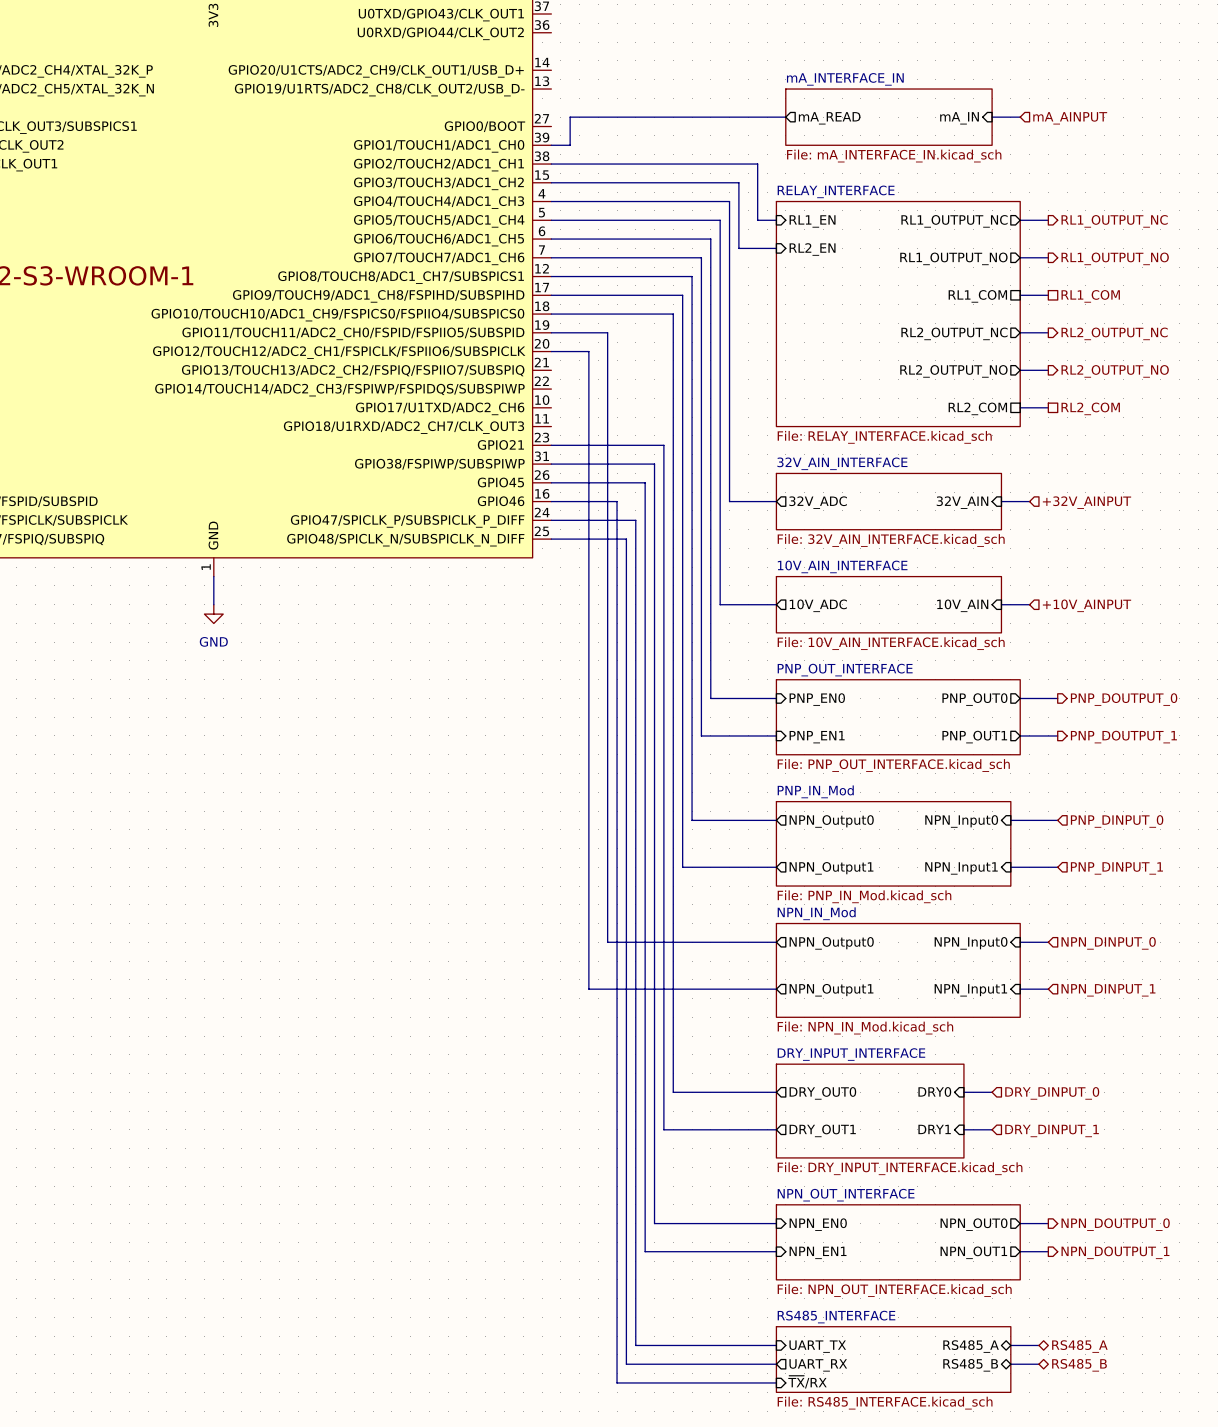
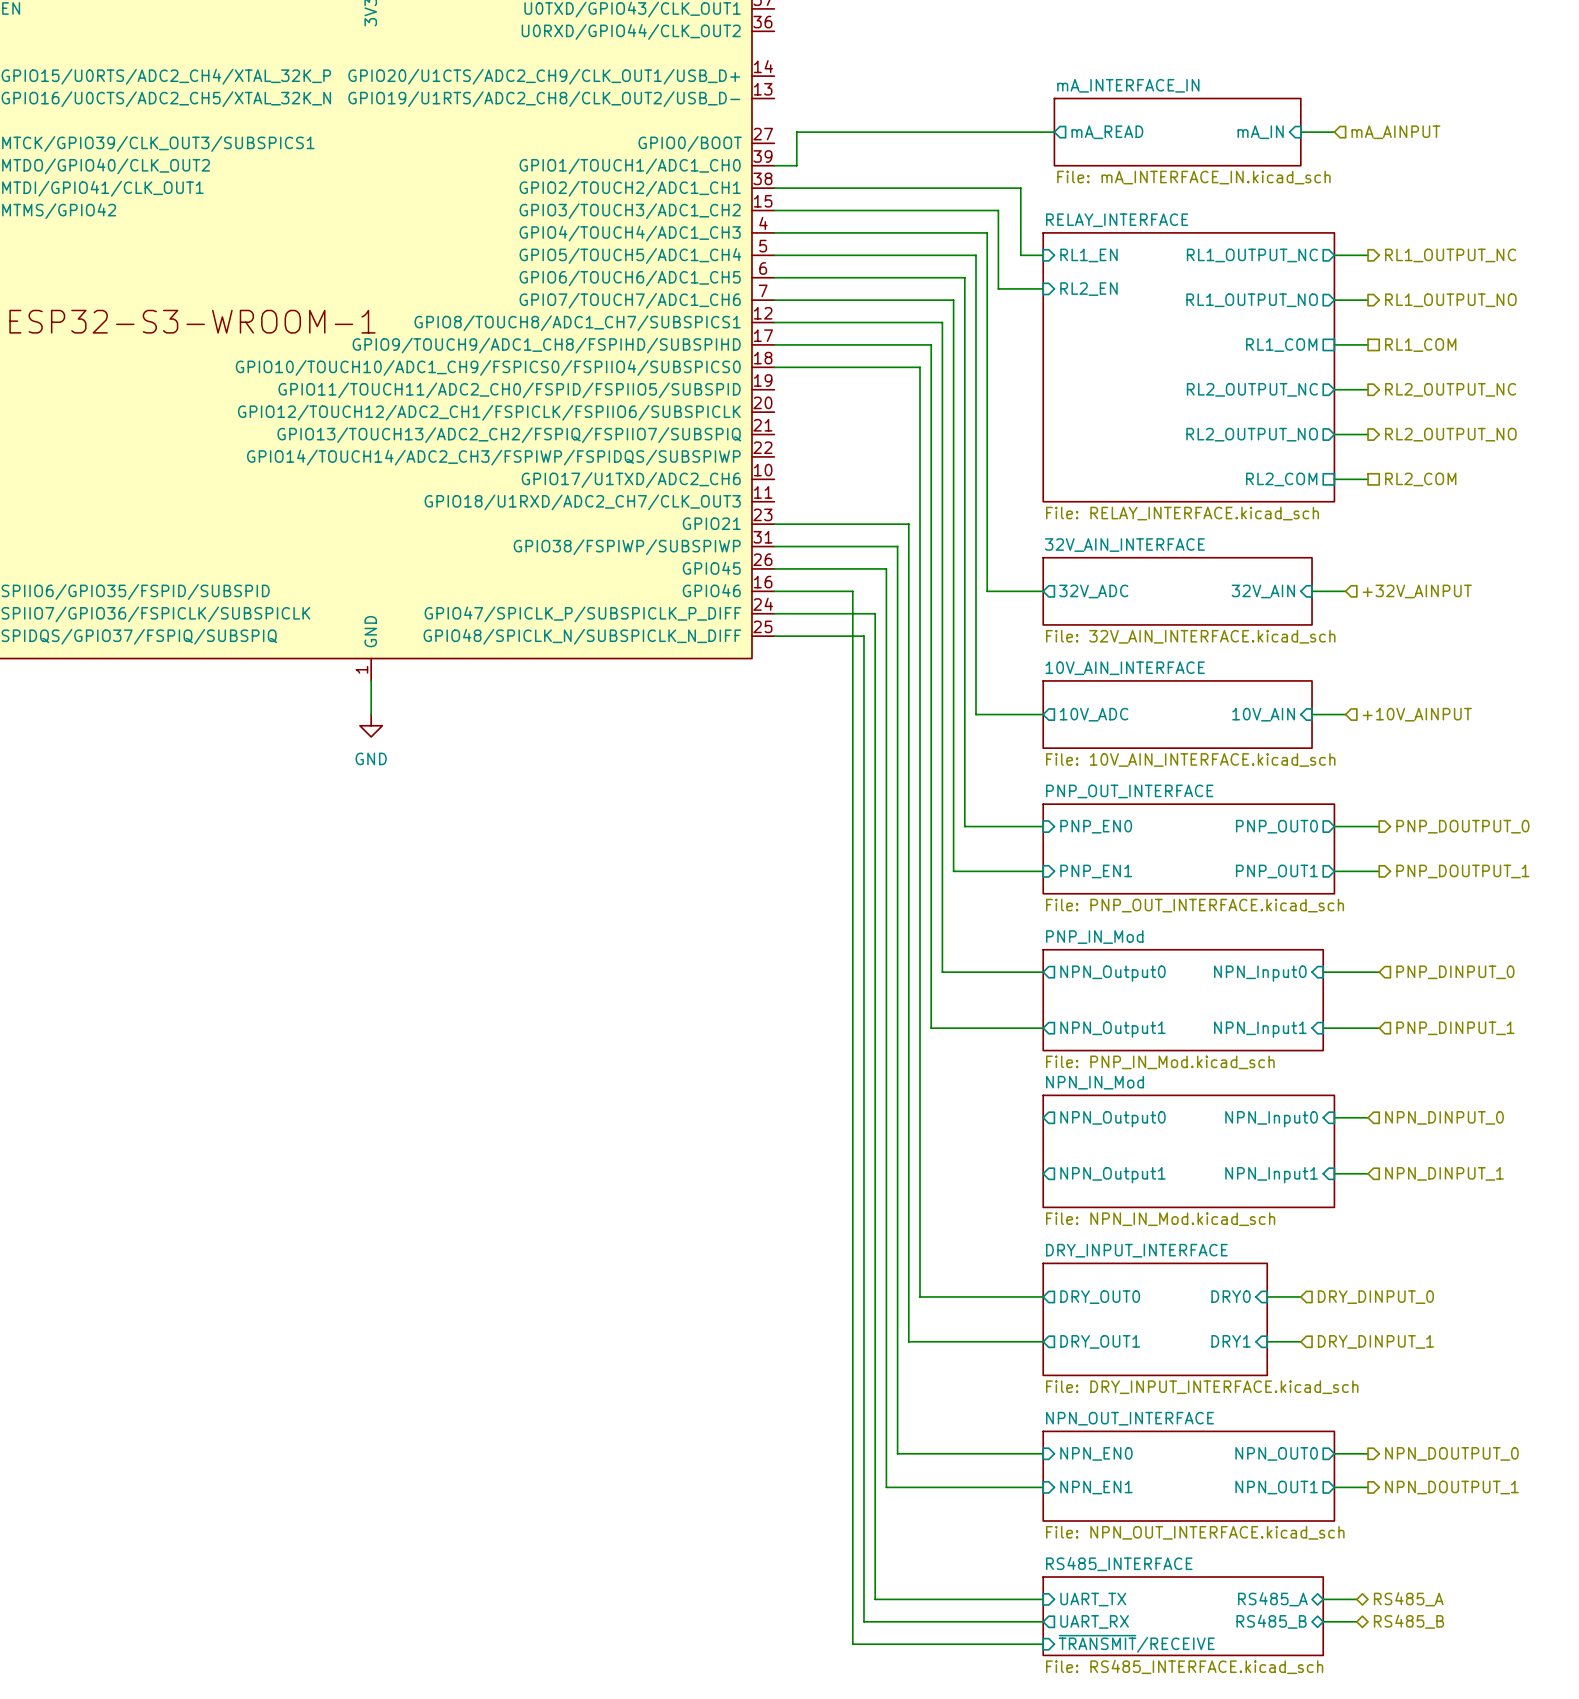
wire: (551, 332) (607, 332) (607, 942) (776, 942) -> none
wire: (551, 351) (588, 351) (588, 989) (776, 989) -> none
sheet pin: ~{TX}/RX (807, 1382) -> ~{TRANSMIT}/RECEIVE (1136, 1643)

